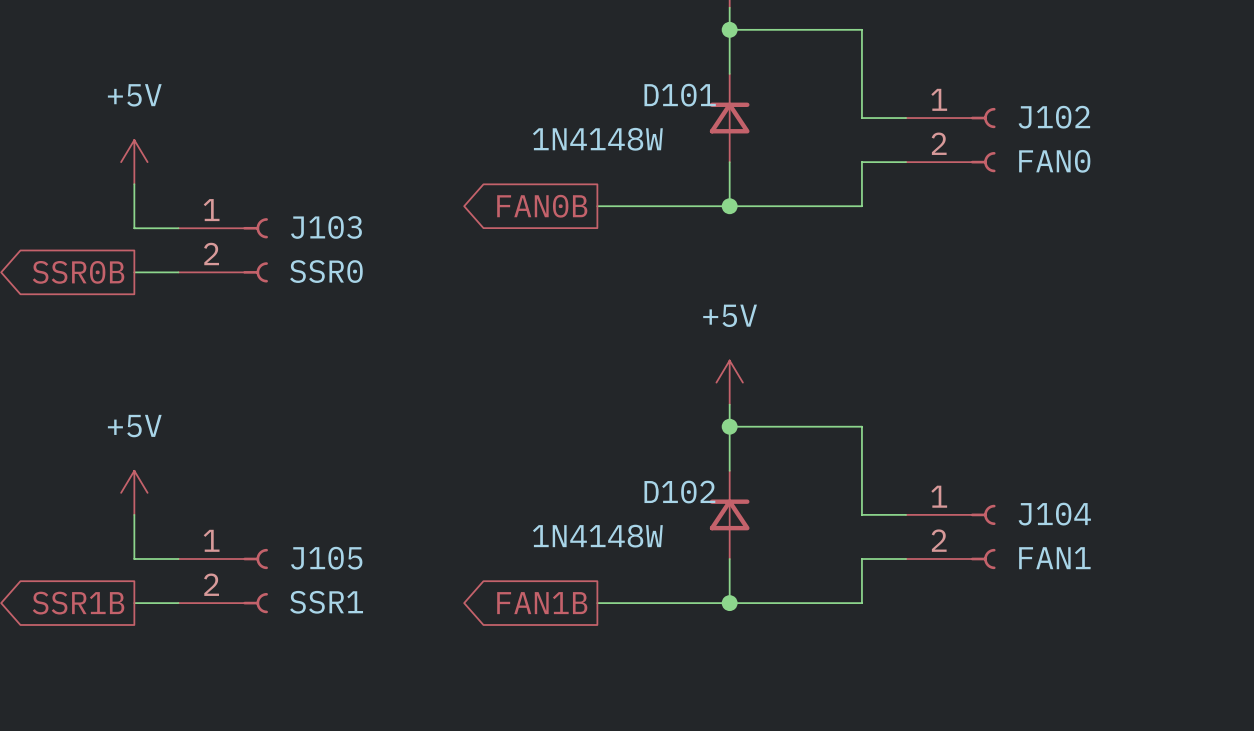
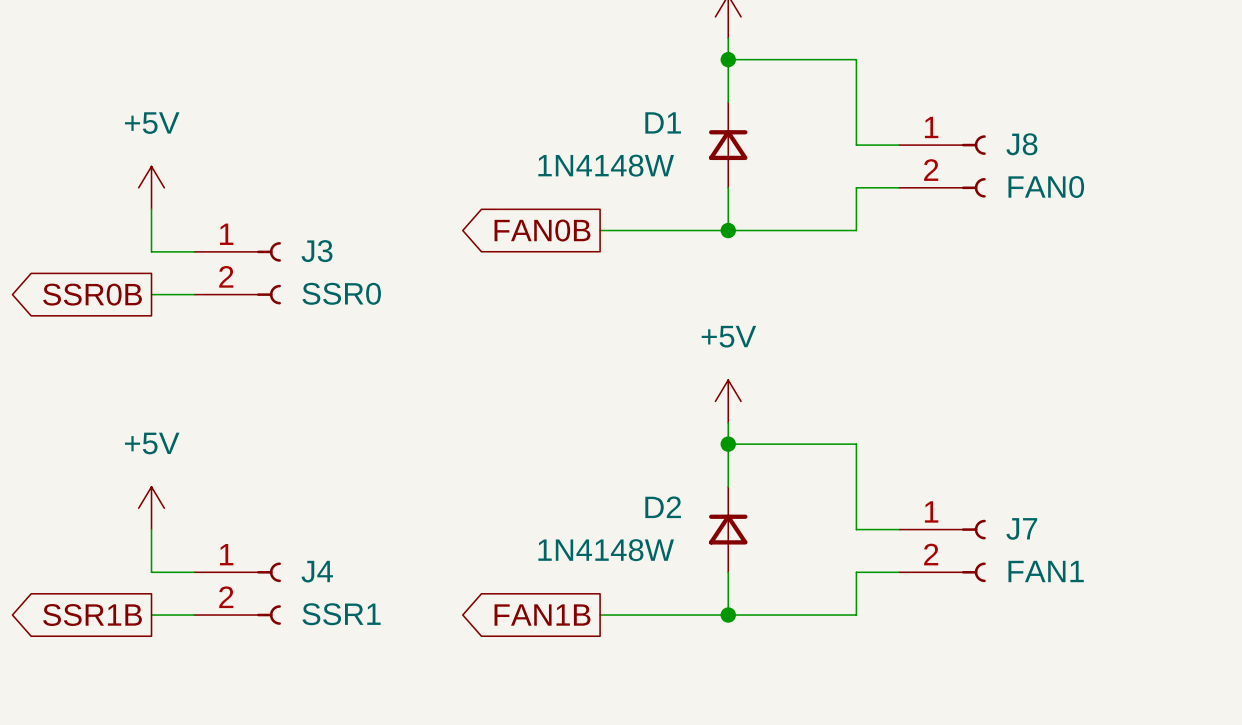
D101 name: D101 (680, 95) -> D1 (663, 122)
J102 name: J102 (1054, 117) -> J8 (1021, 144)
J103 name: J103 (326, 227) -> J3 (316, 251)
D102 name: D102 (679, 492) -> D2 (663, 507)
J104 name: J104 (1054, 514) -> J7 (1021, 528)
J105 name: J105 (326, 558) -> J4 (317, 571)

